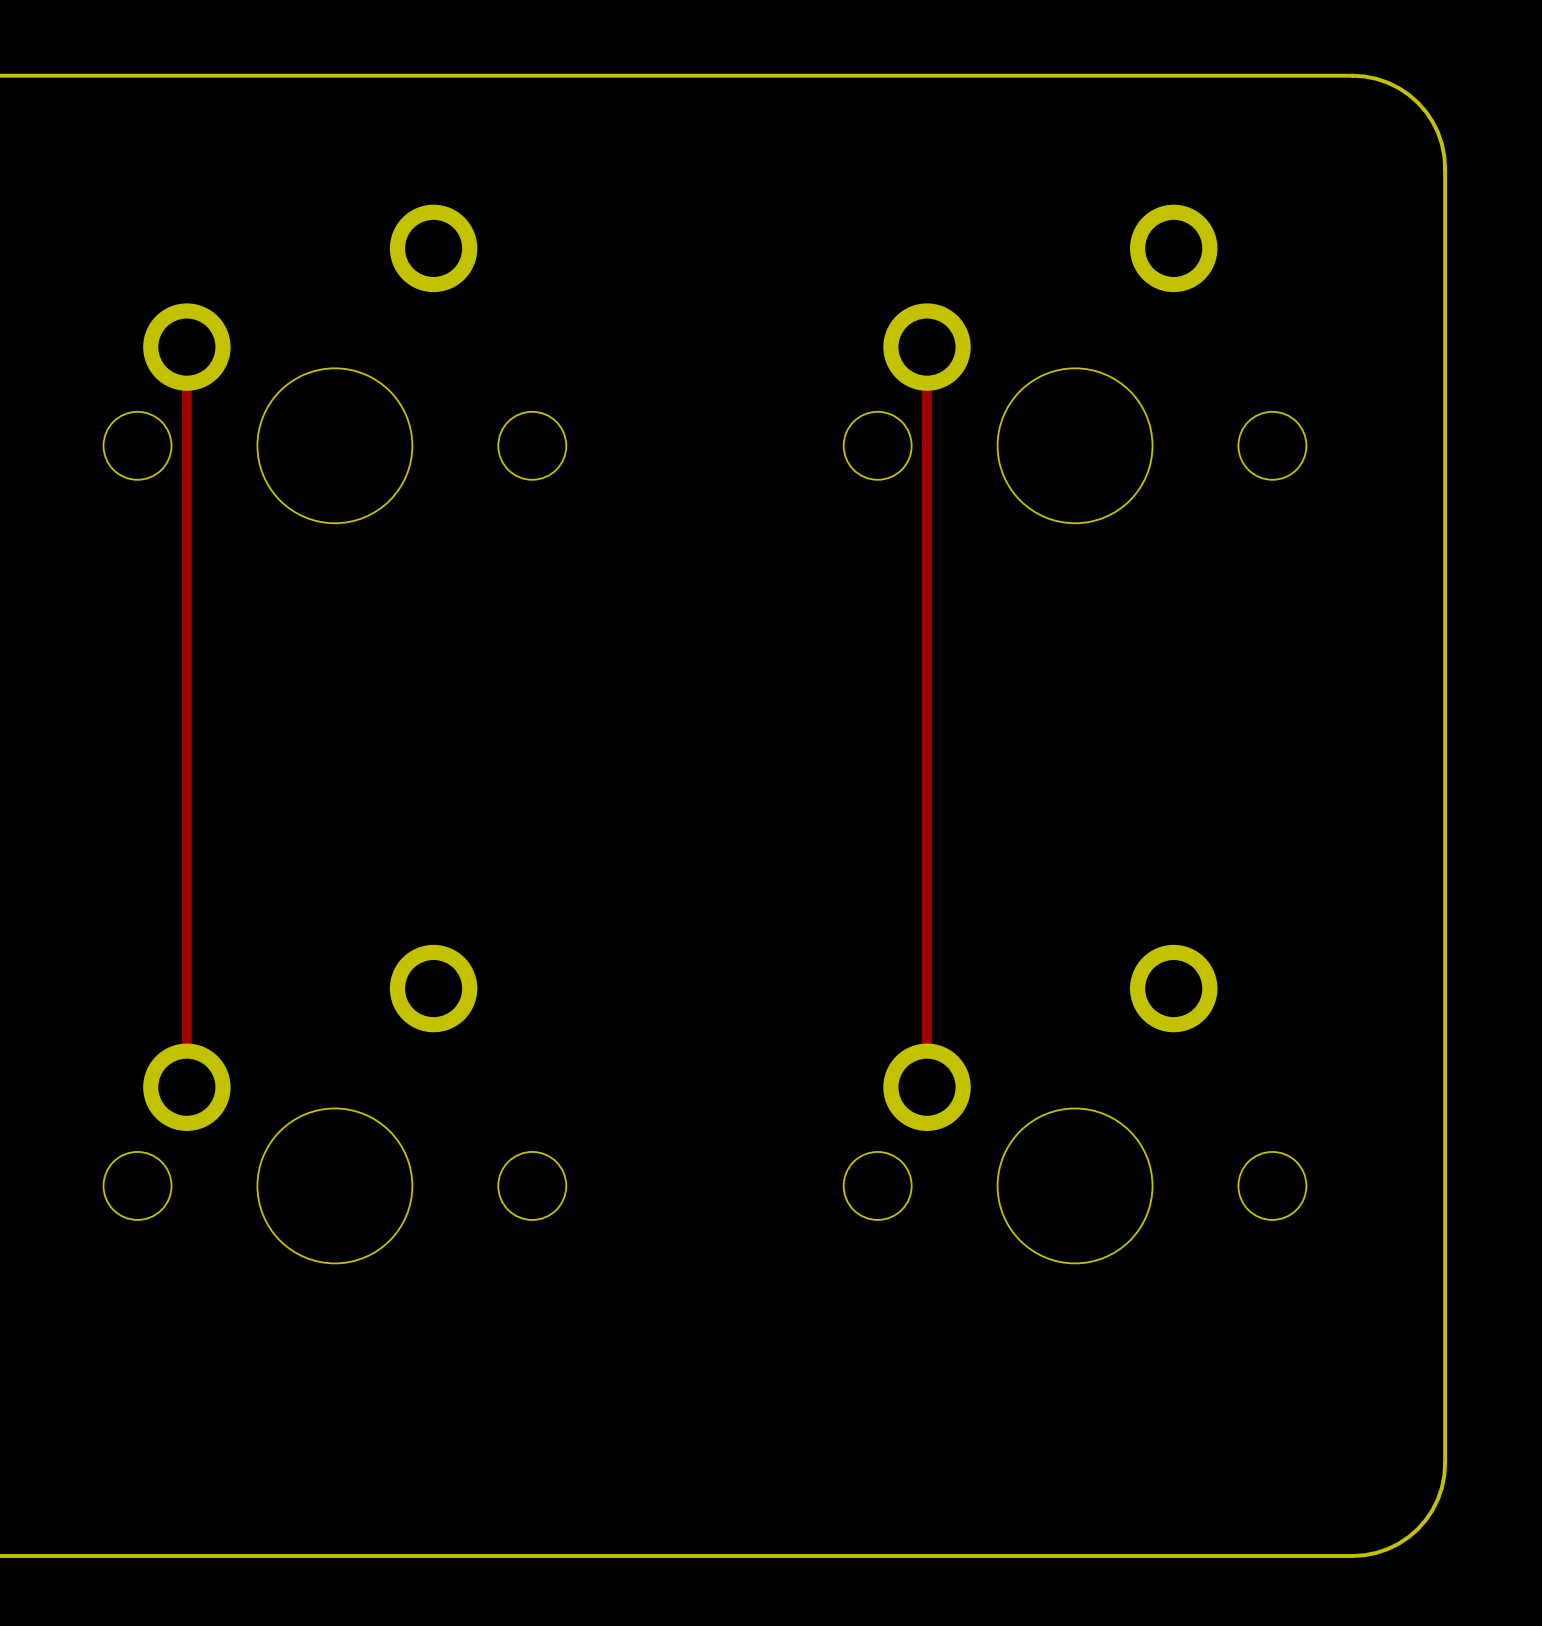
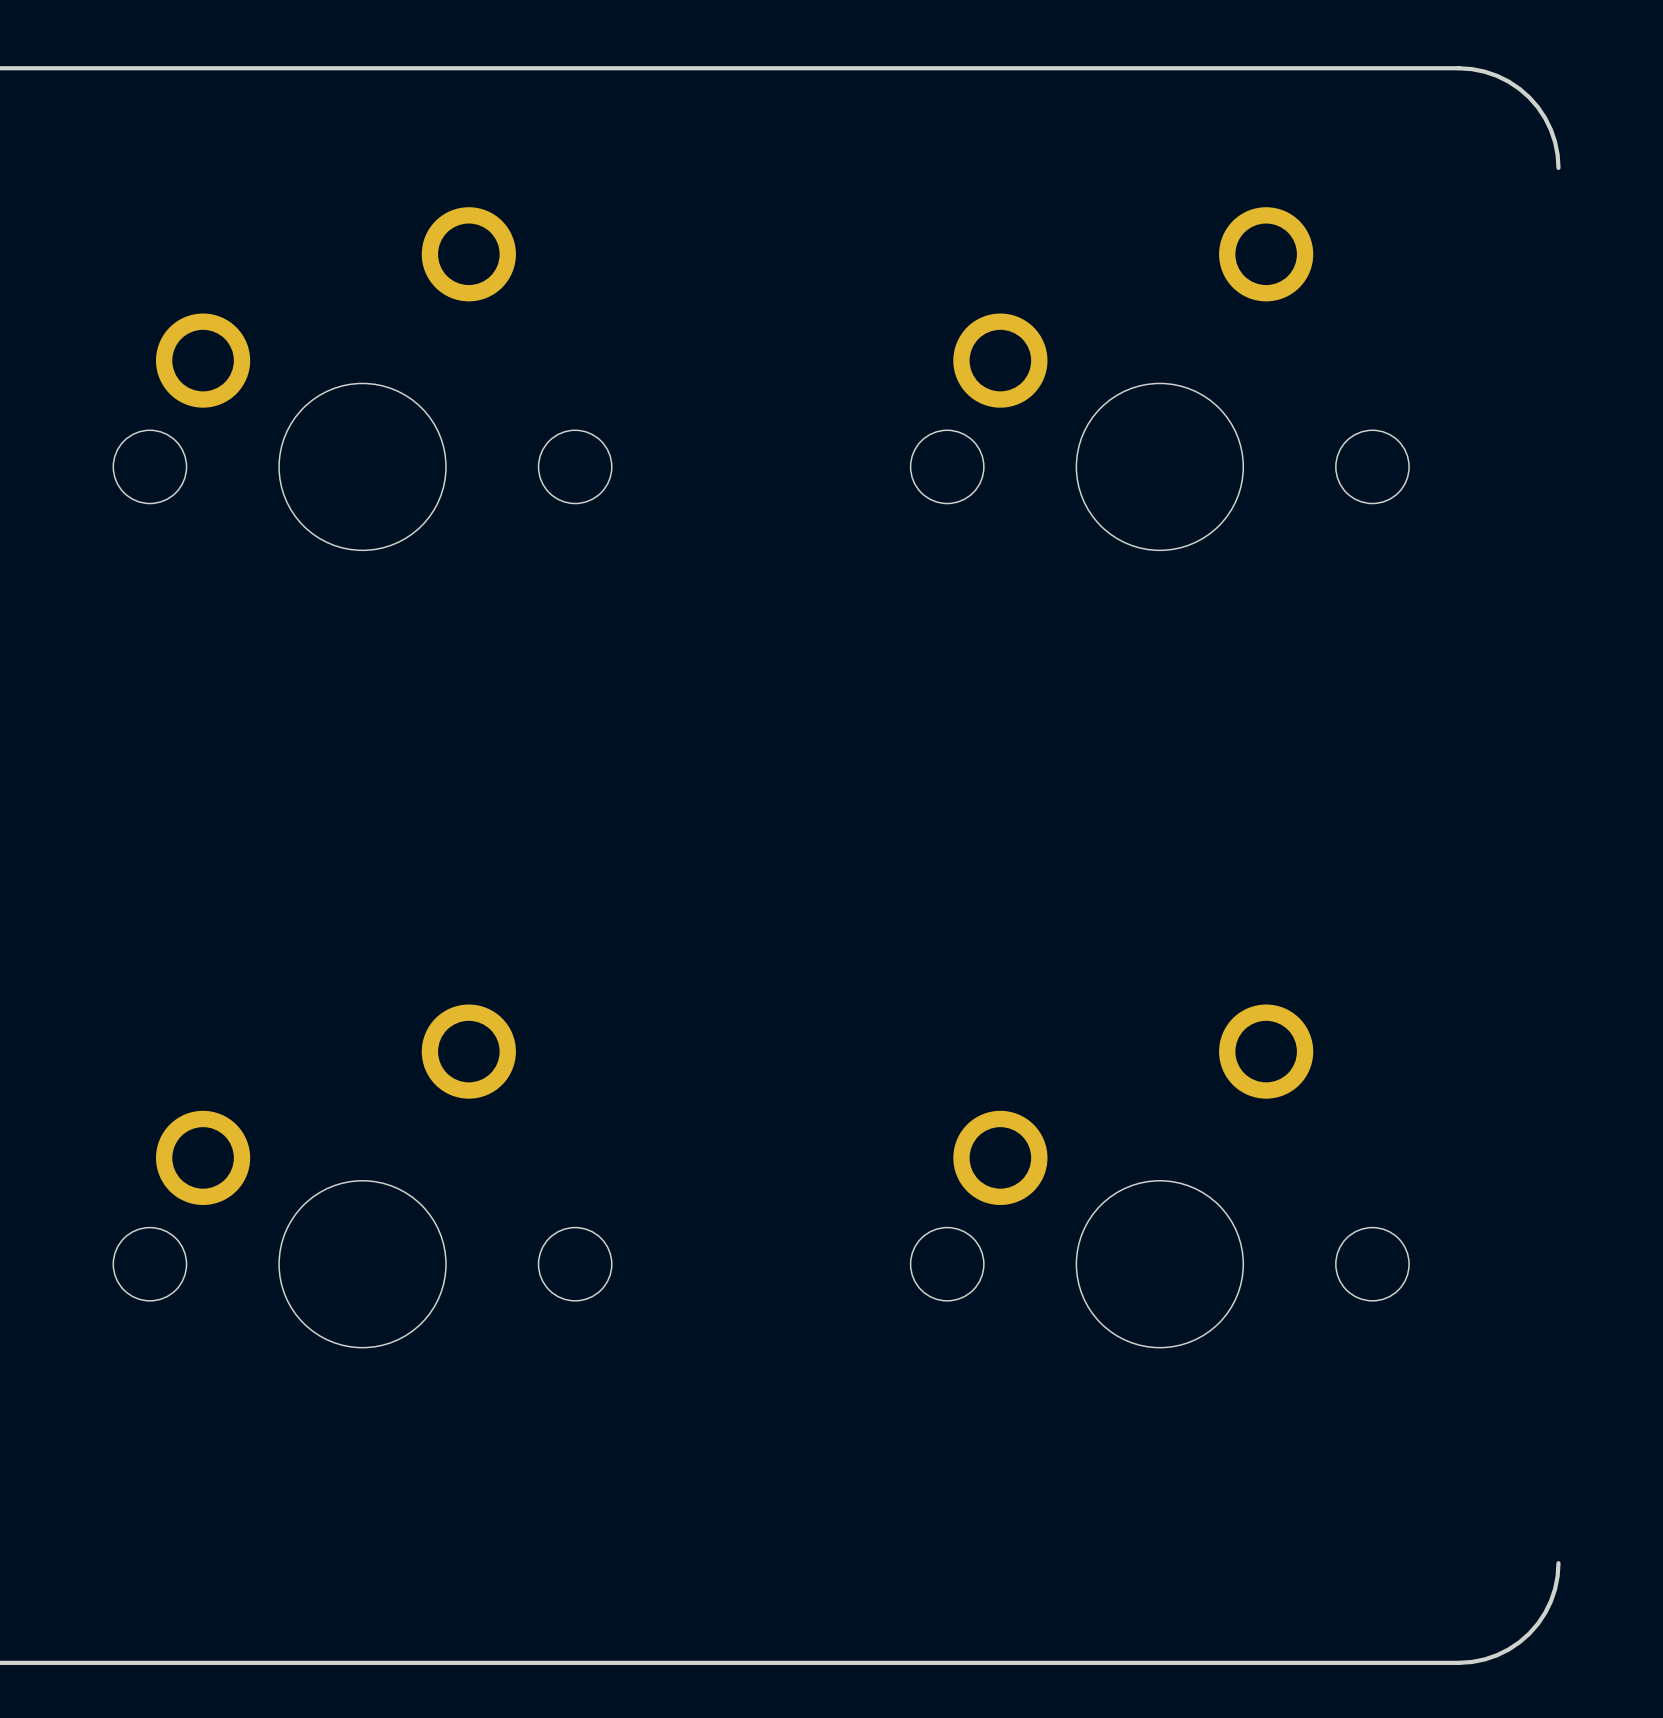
board edge: (1445, 168) (1445, 1463) -> none
track: (186, 347) (186, 1087) -> none
track: (927, 347) (927, 1087) -> none

